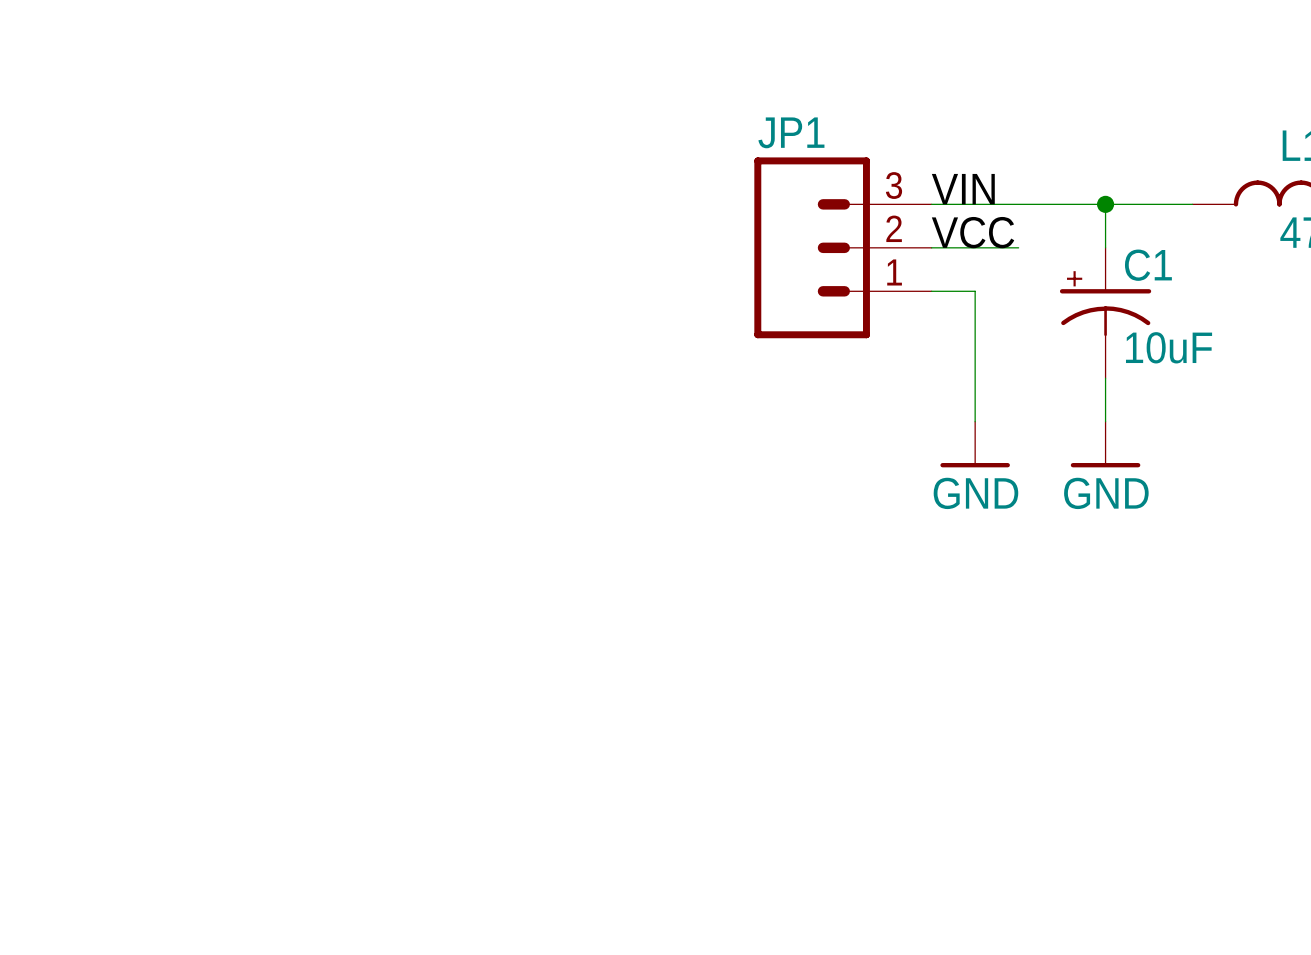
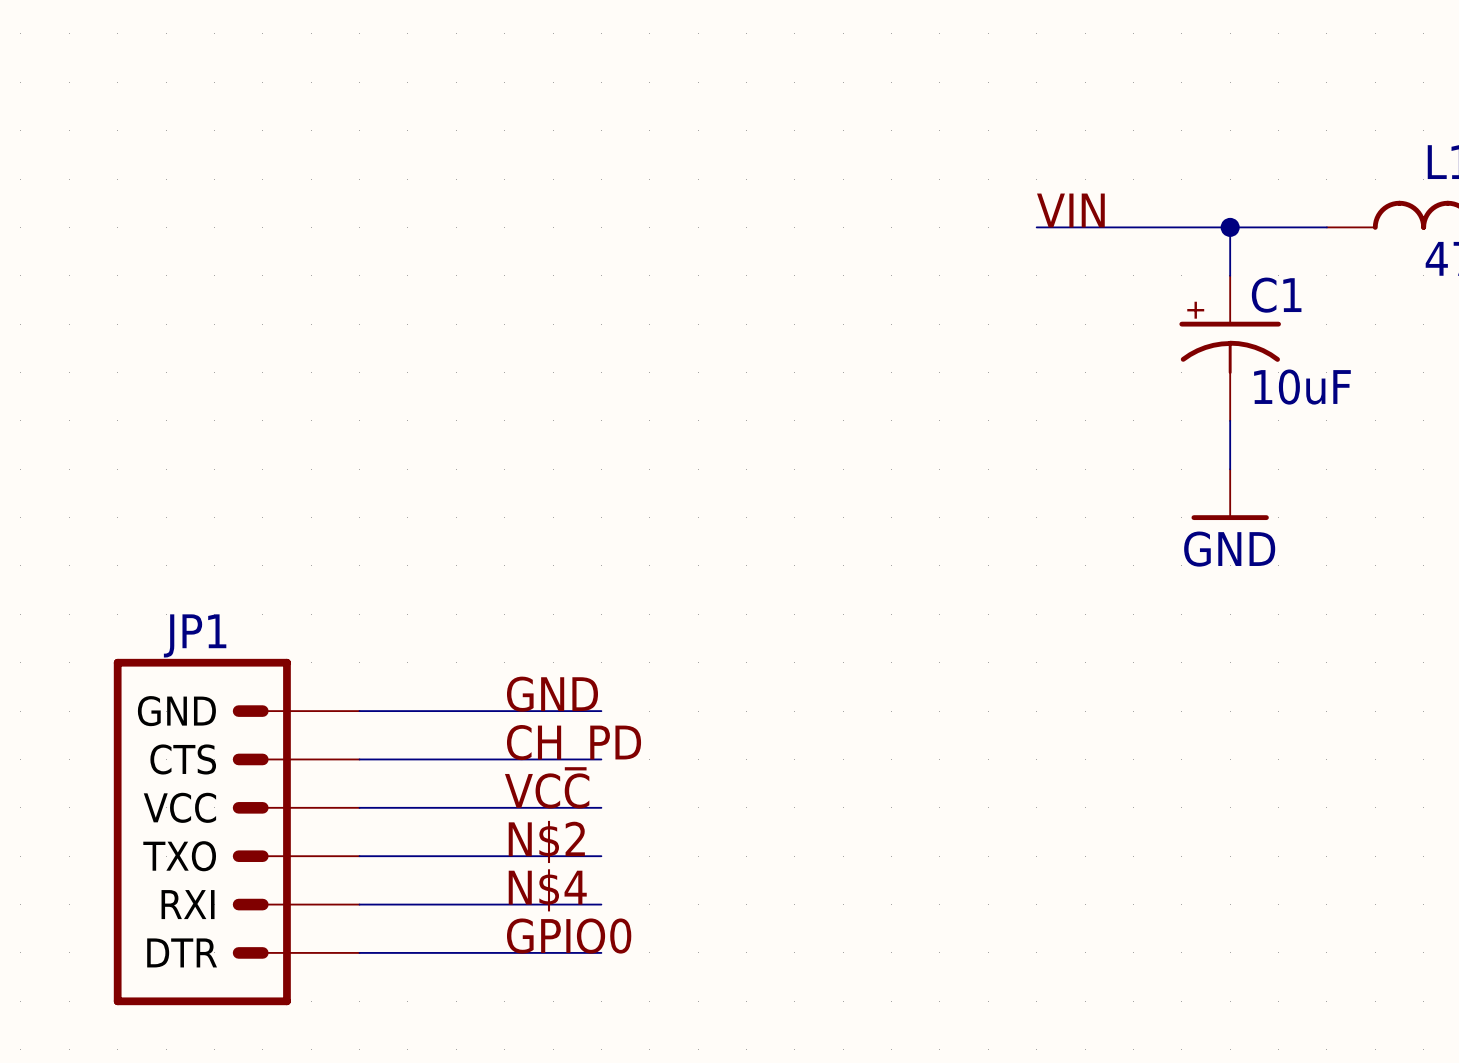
JP1 name position: JP1 (791, 132) -> JP1 (195, 635)
JP1 symbol: [754, 157, 932, 339] -> [113, 658, 360, 1006]
label: VCC (973, 232) -> none
wire: (931, 247) (1018, 247) -> none
wire: (931, 291) (975, 291) (975, 421) -> none
power symbol: GND (975, 444) -> none
label: none -> GND (552, 694)
wire: none -> (359, 711) (601, 711)
label: none -> CH_PD (574, 747)
wire: none -> (359, 759) (601, 759)
label: none -> VCC (547, 790)
wire: none -> (359, 807) (601, 807)
label: none -> N$2 (546, 841)
wire: none -> (359, 856) (601, 856)
label: none -> N$4 (547, 890)
wire: none -> (359, 904) (601, 904)
label: none -> GPIO0 (569, 936)
wire: none -> (359, 952) (601, 952)

